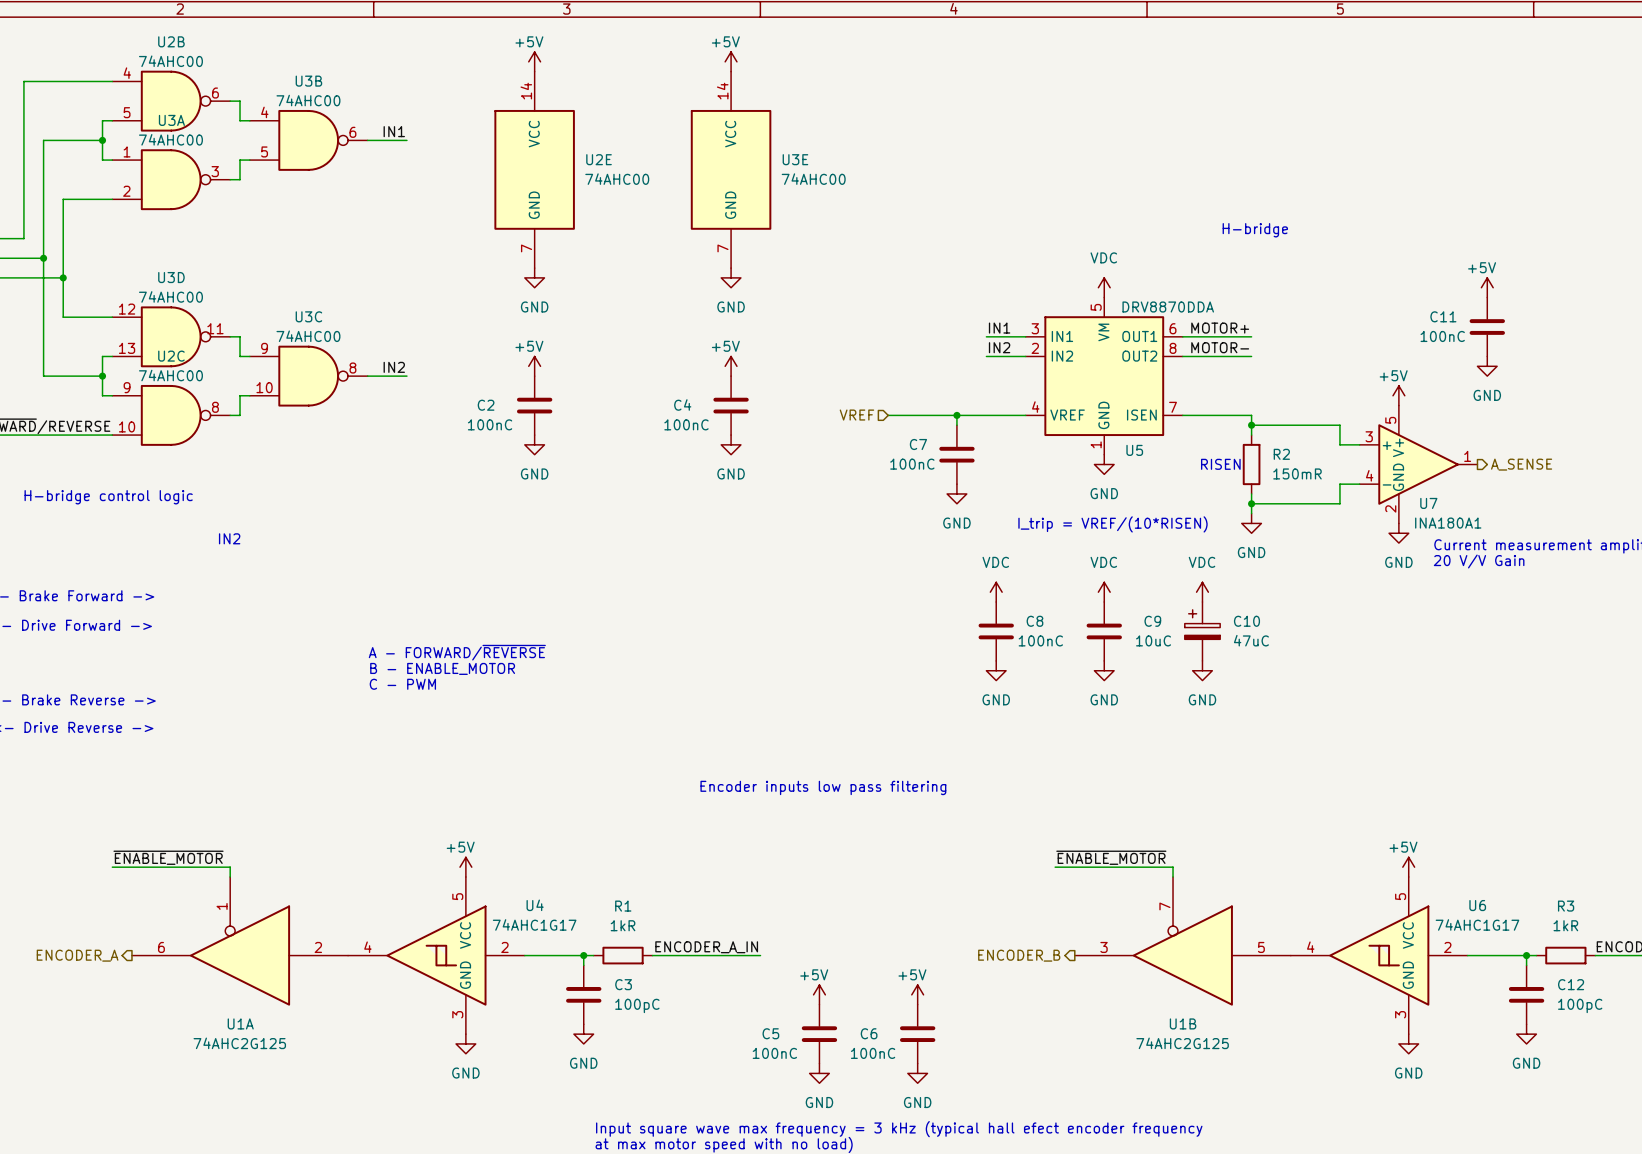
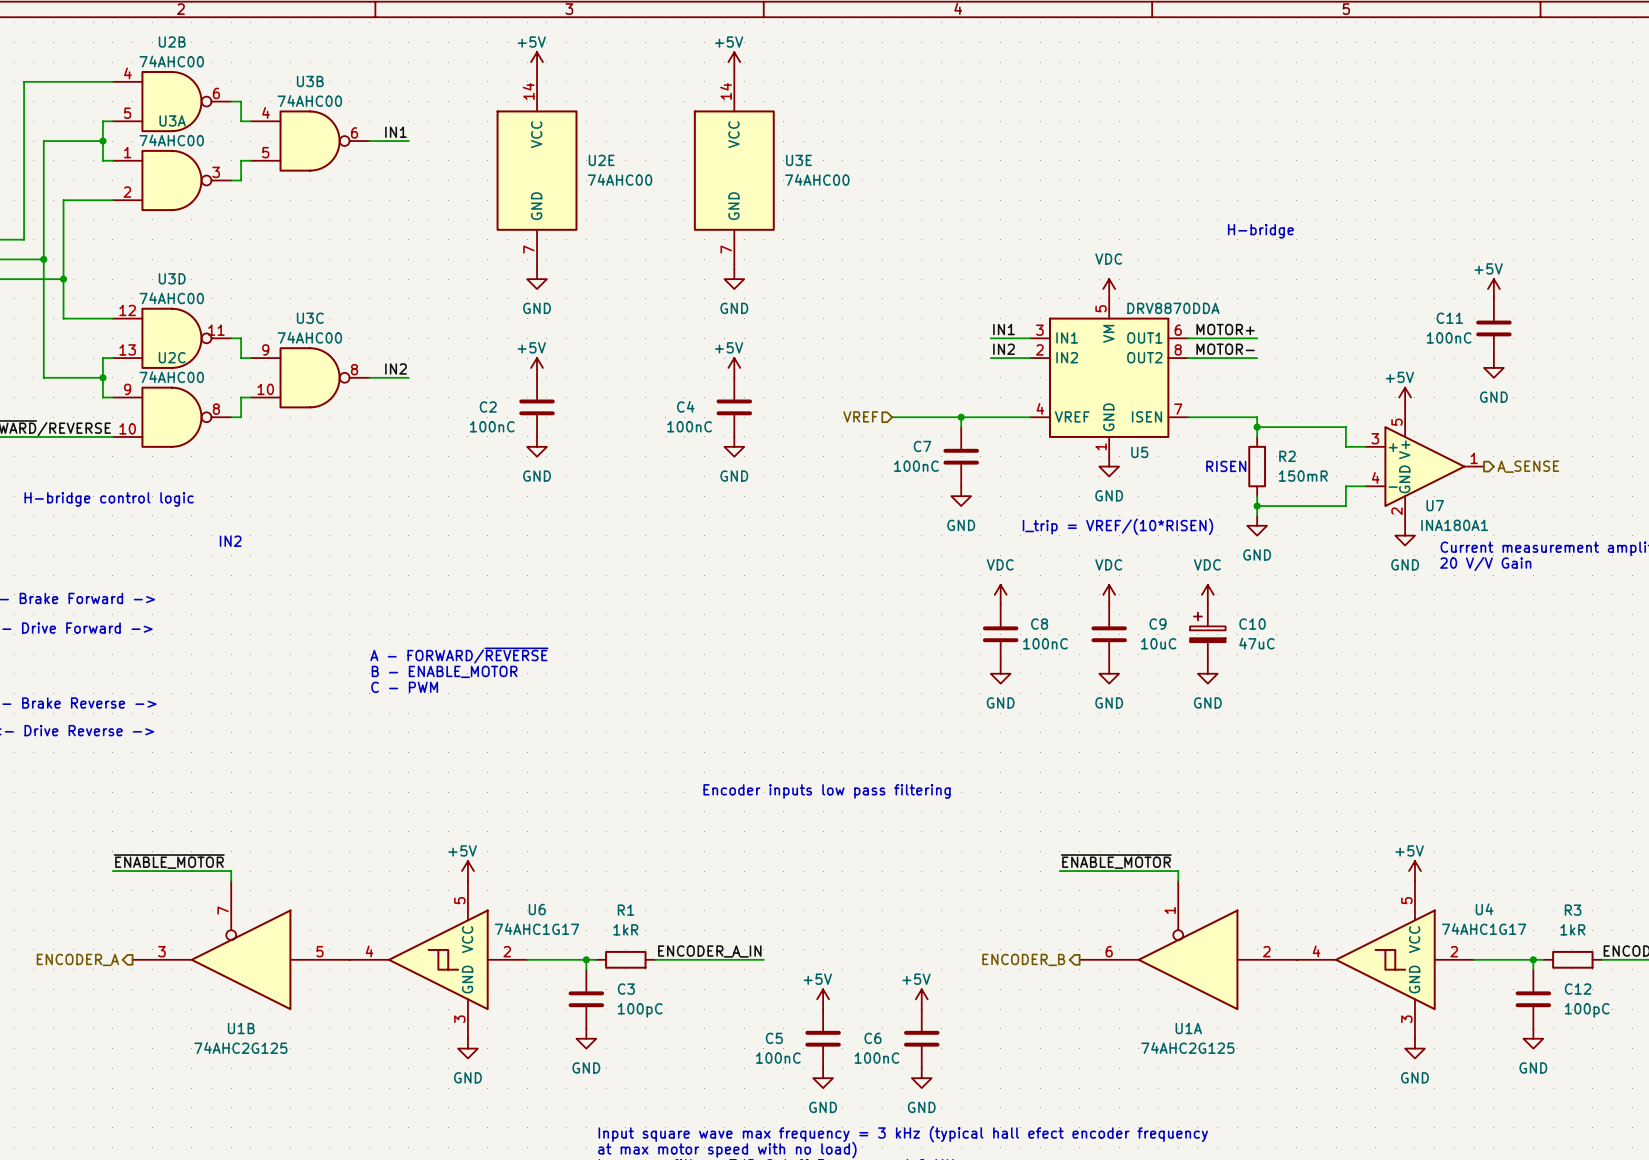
U4 name: U4 (535, 905) -> U6 (537, 909)
U6 name: U6 (1477, 905) -> U4 (1484, 909)
U1A position: (240, 941) -> (1188, 945)
U1B position: (1182, 941) -> (241, 945)

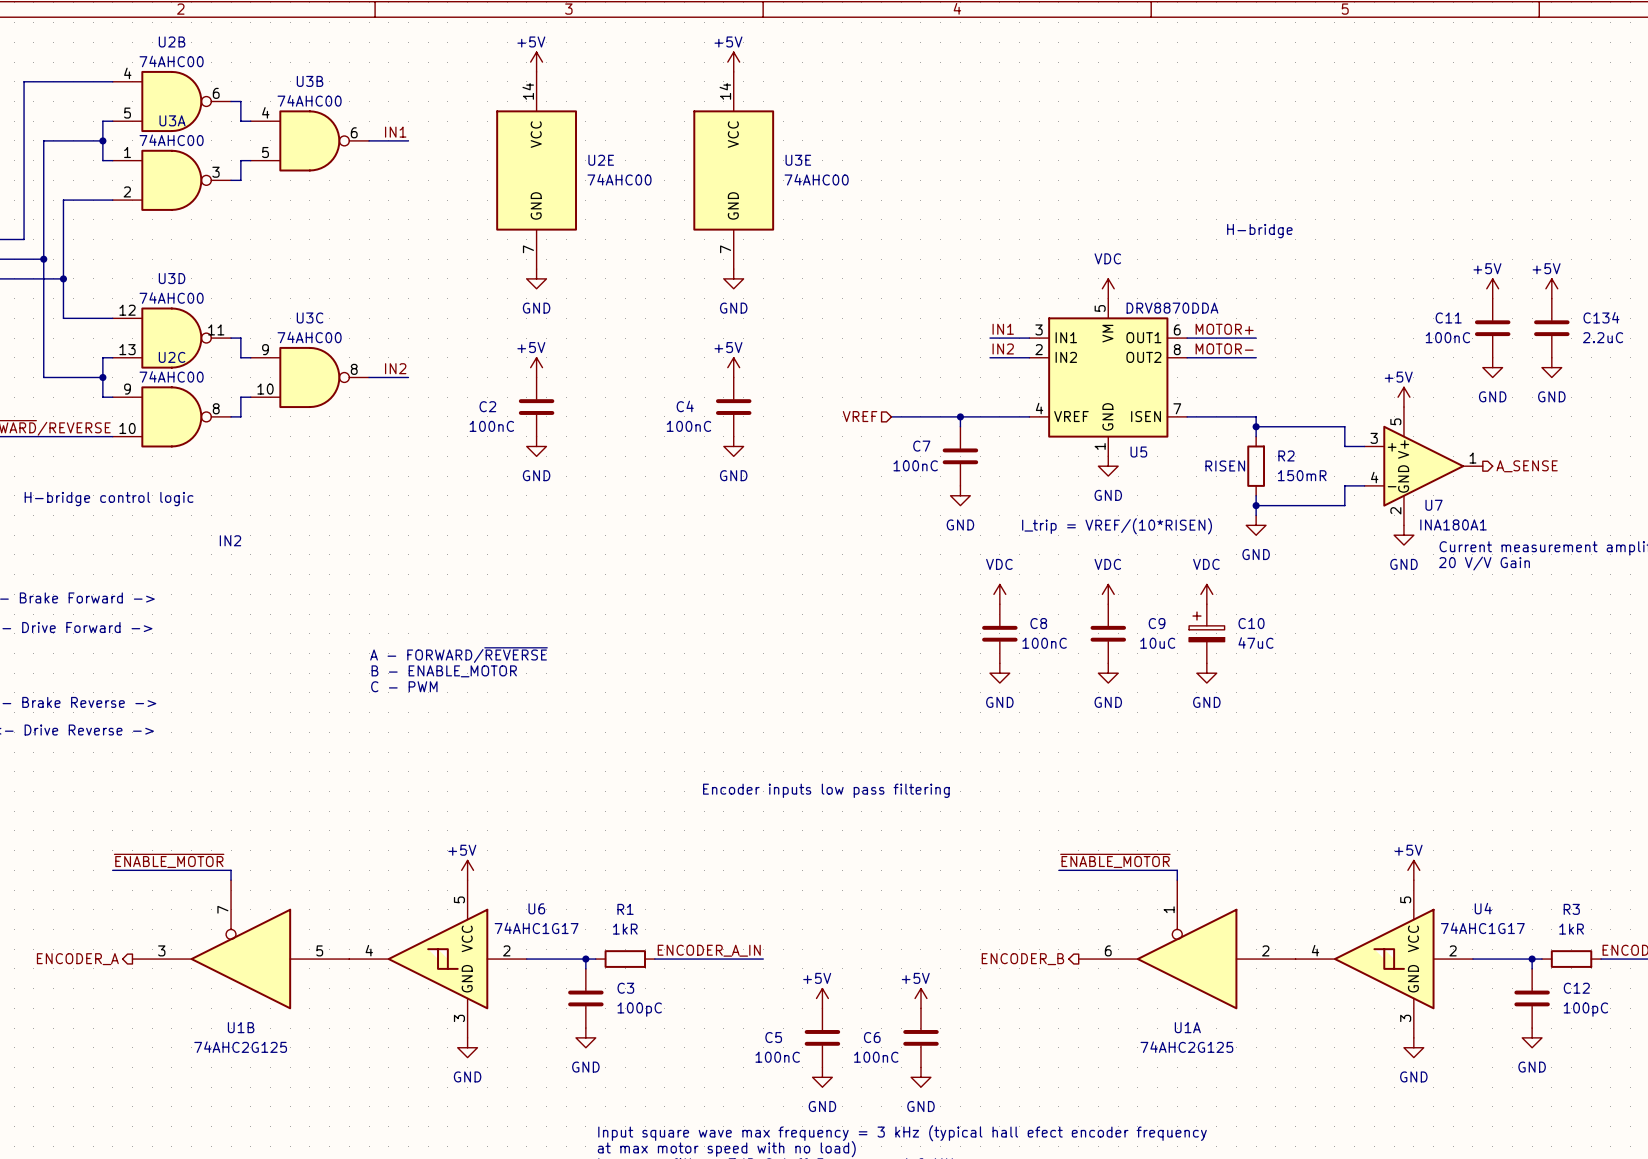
power symbol: none -> +5V (1551, 288)
C134: none -> 2.2uC (1551, 328)
power symbol: none -> GND (1551, 367)

